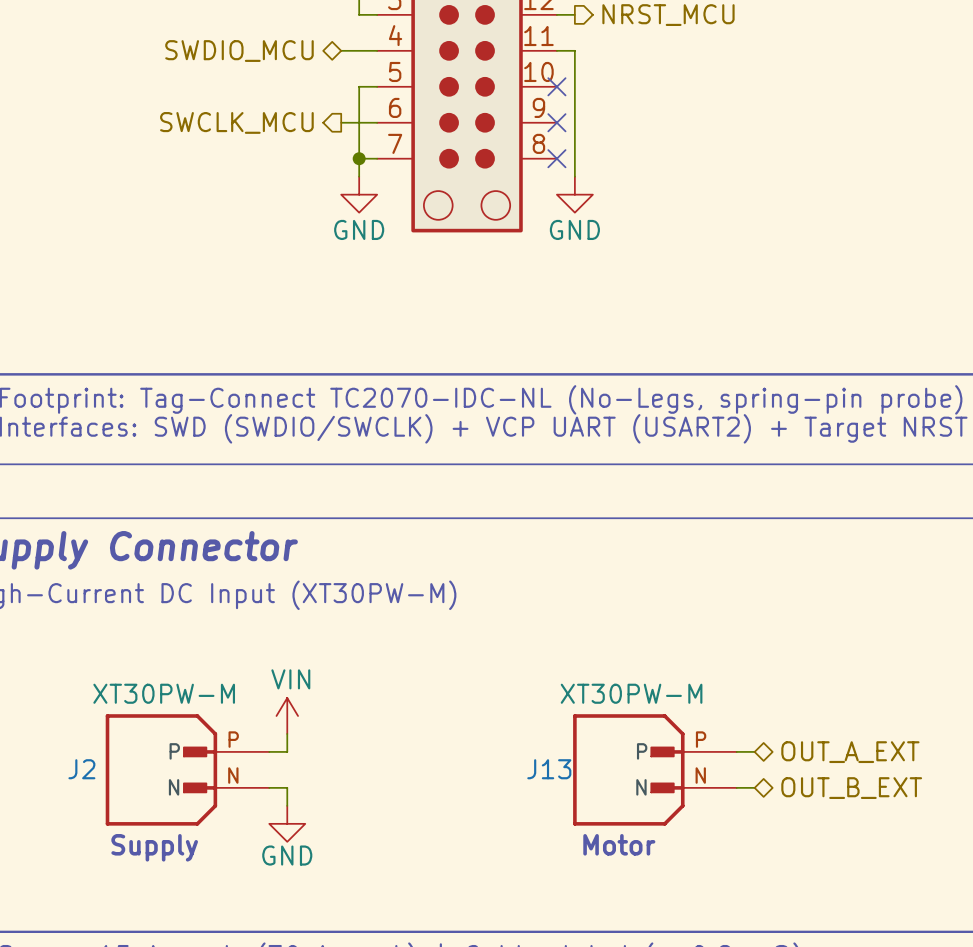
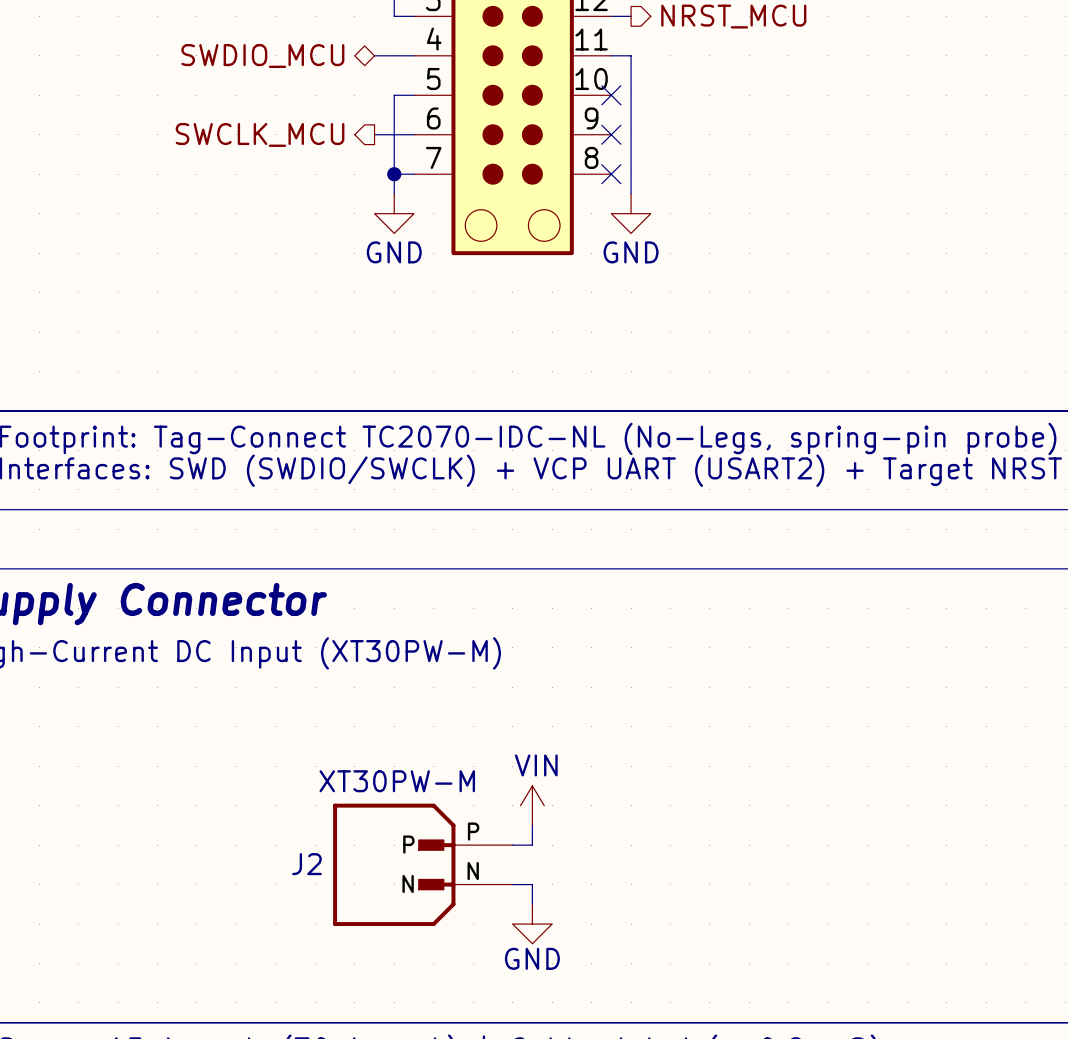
power symbol position: VIN (287, 715) -> VIN (532, 805)
wire: (287, 733) (287, 751) (269, 751) -> (532, 825) (532, 845) (512, 845)
wire: (736, 751) (754, 751) -> none
hierarchical label: OUT_A_EXT (850, 752) -> none
J2 position: (187, 769) -> (422, 864)
J13: XT30PW-M (654, 769) -> none
wire: (269, 787) (287, 787) (287, 805) -> (512, 884) (532, 884) (532, 904)
wire: (736, 787) (754, 787) -> none
hierarchical label: OUT_B_EXT (851, 788) -> none
power symbol position: GND (287, 823) -> GND (532, 924)
text: Motor (619, 844) -> none
text: Supply (154, 847) -> none

